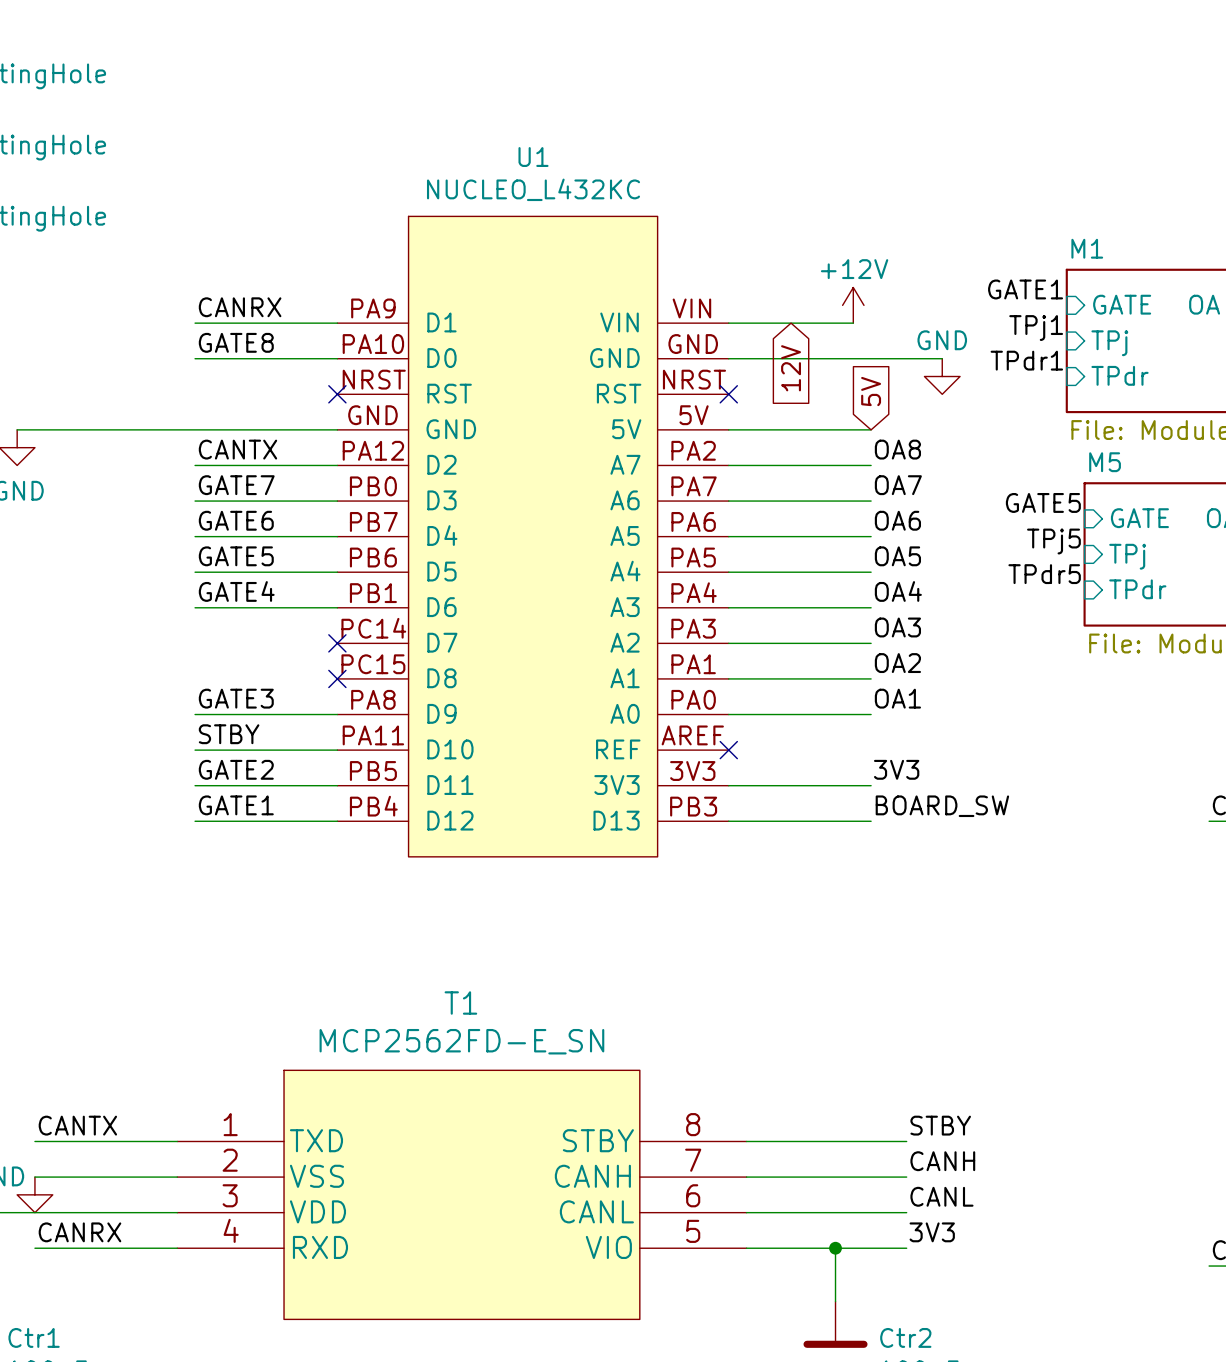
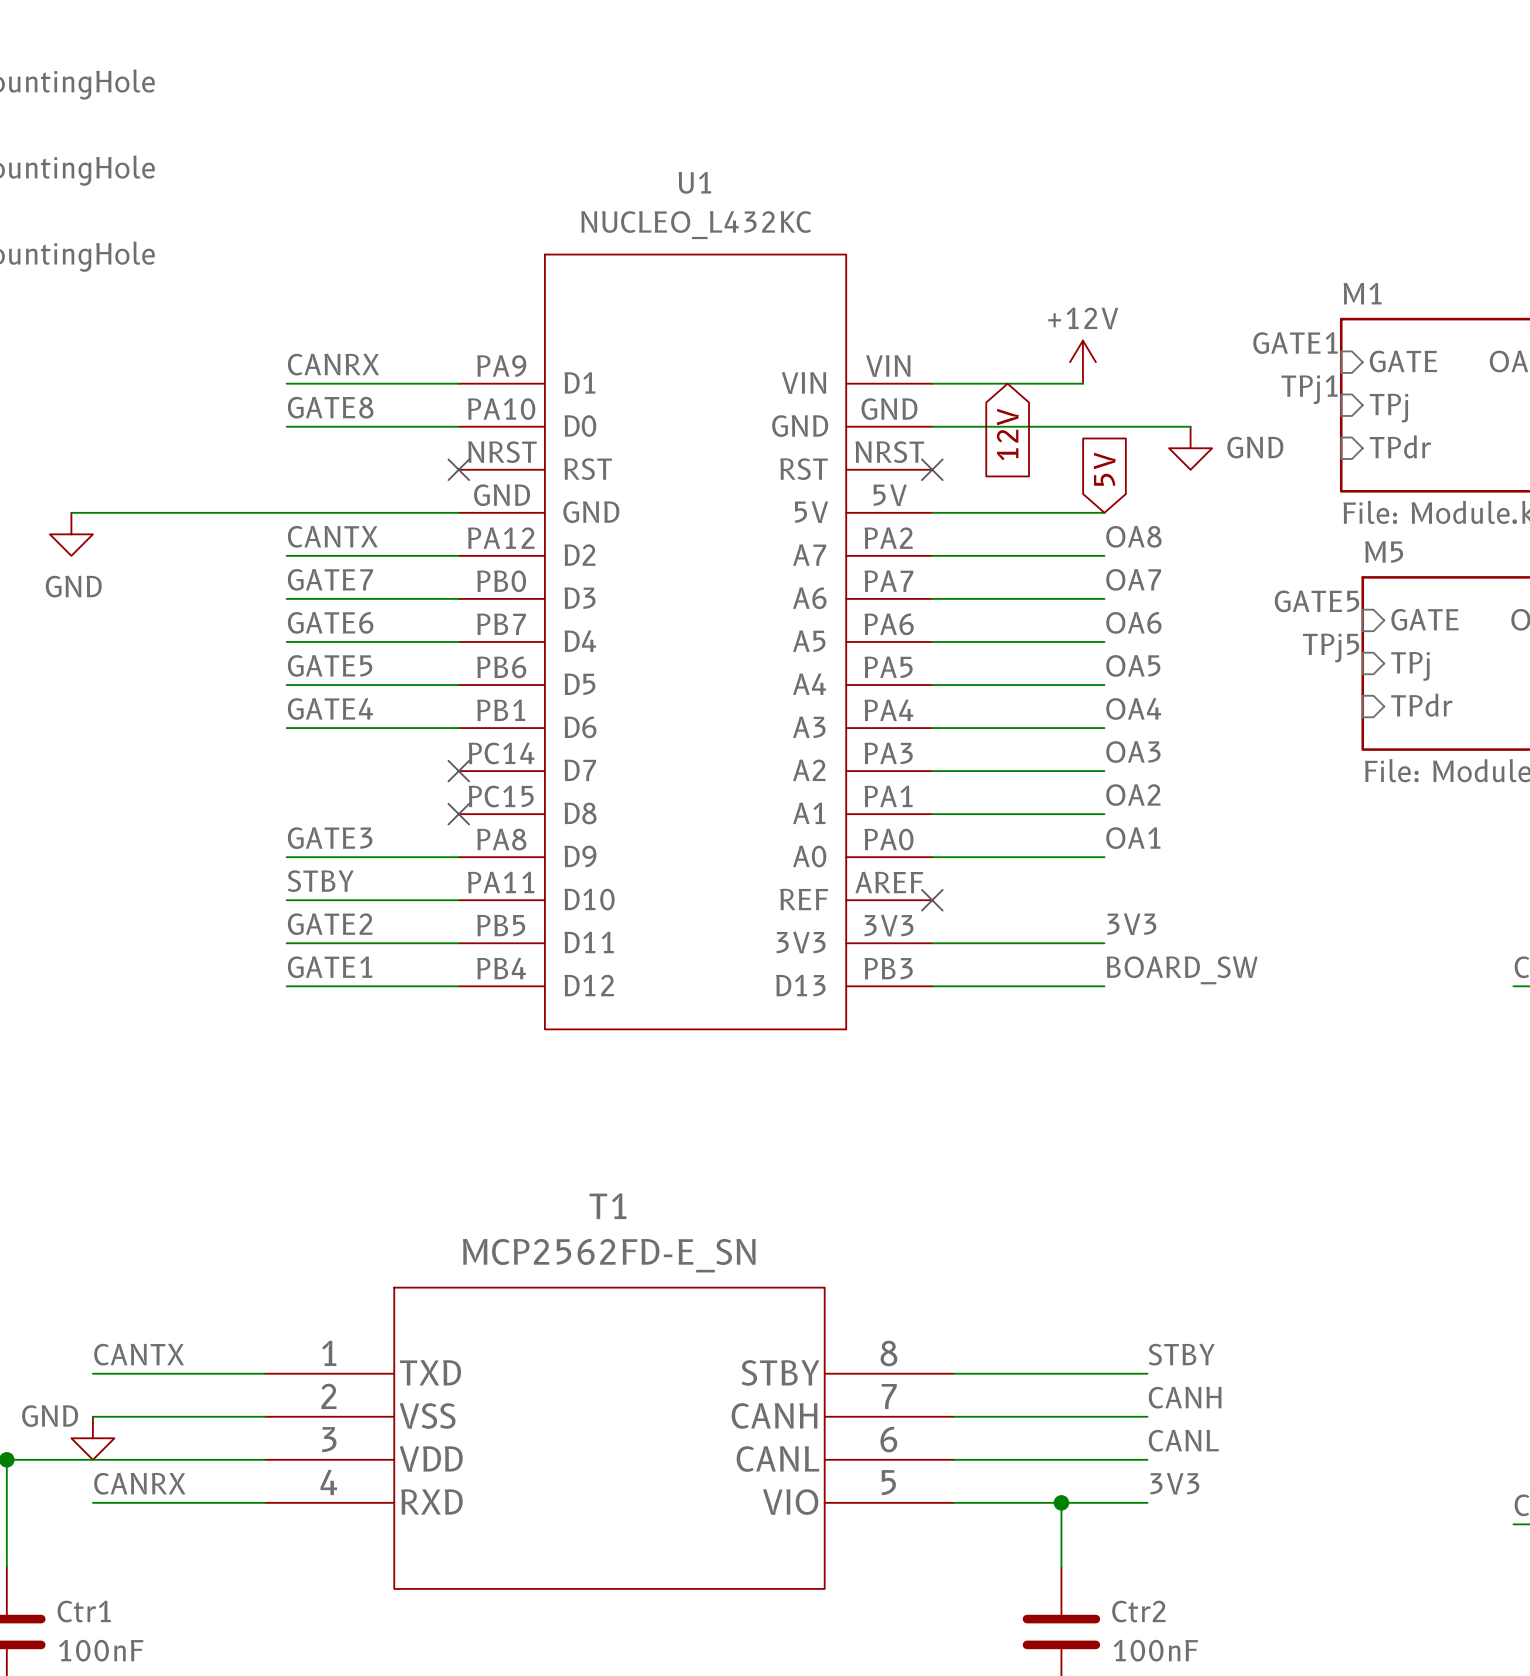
power symbol text position: GND (942, 340) -> GND (1255, 447)
label: TPdr1 (1026, 360) -> none
label: TPdr5 (1044, 574) -> none

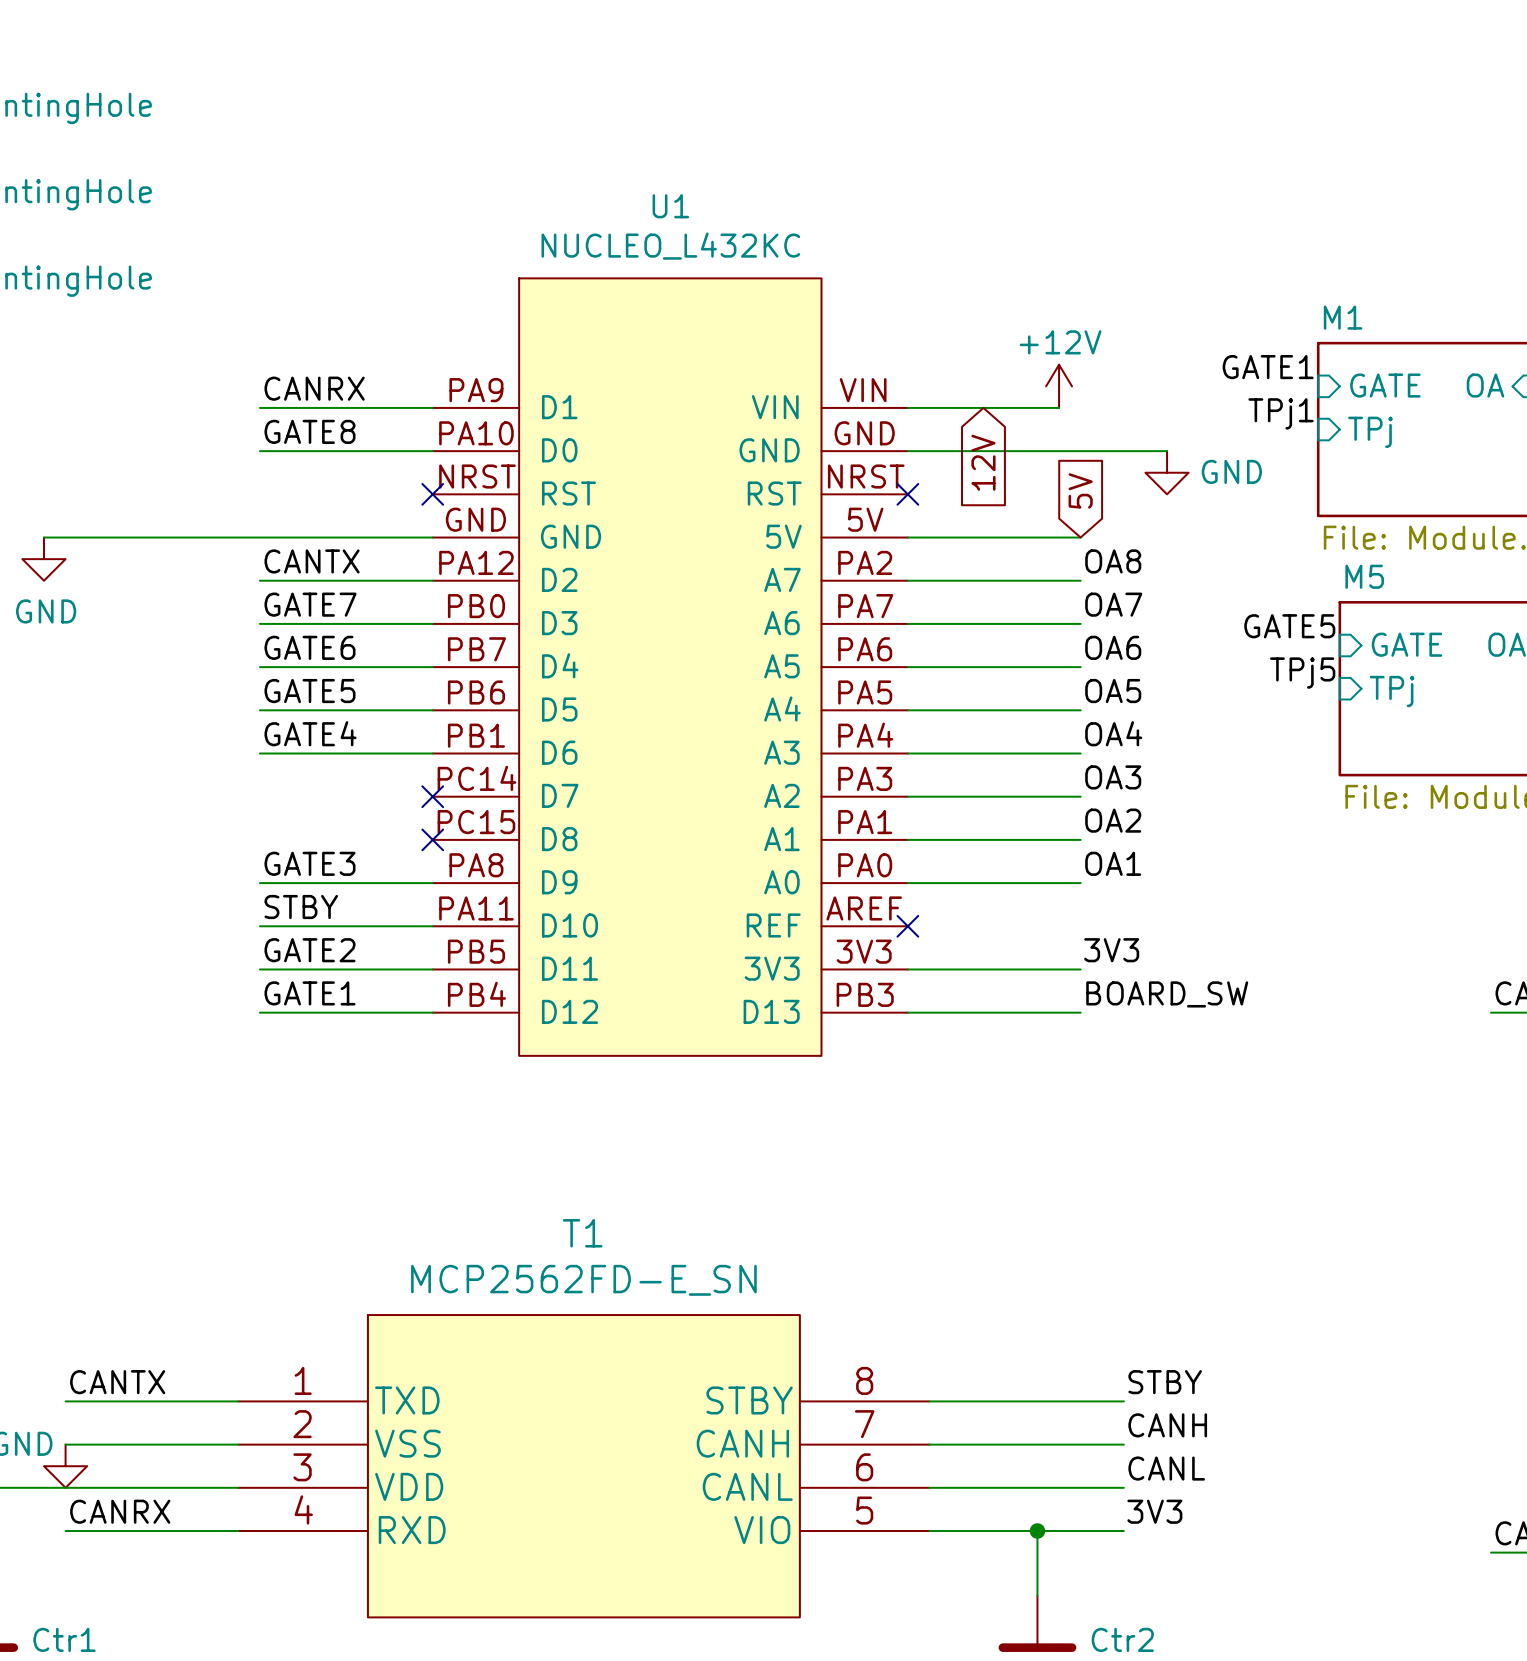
sheet pin: TPdr (1400, 446) -> none
sheet pin: TPdr (1421, 705) -> none

